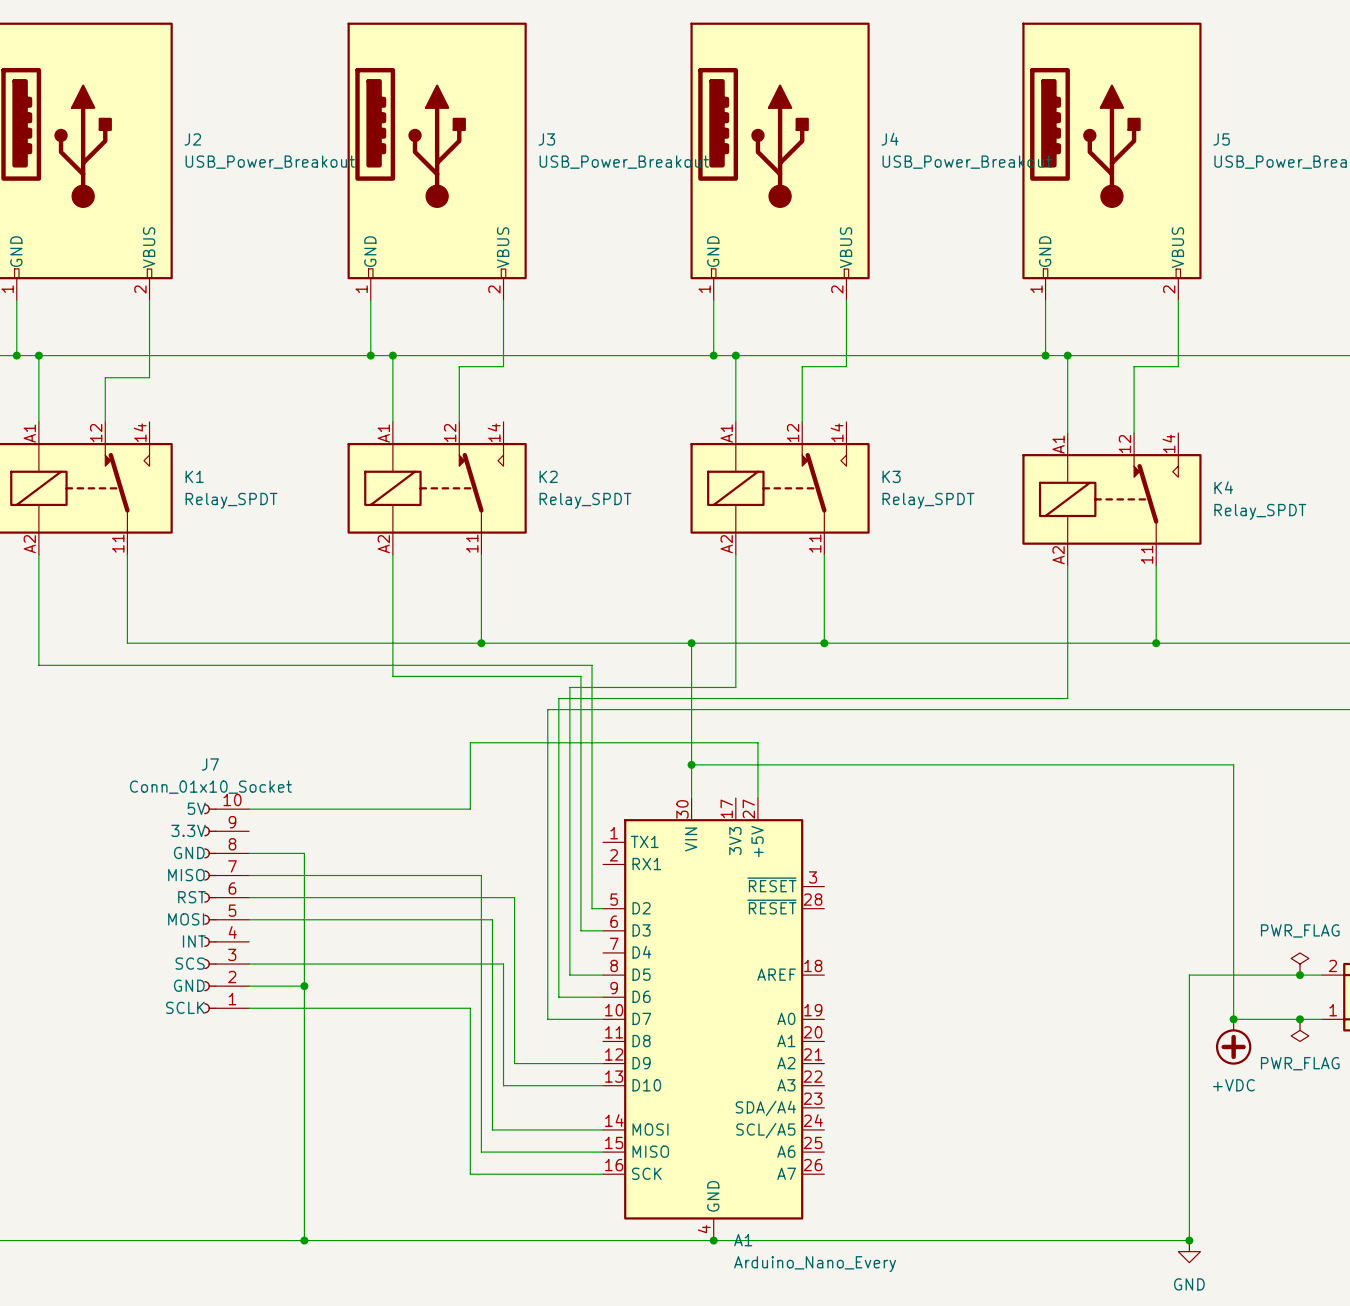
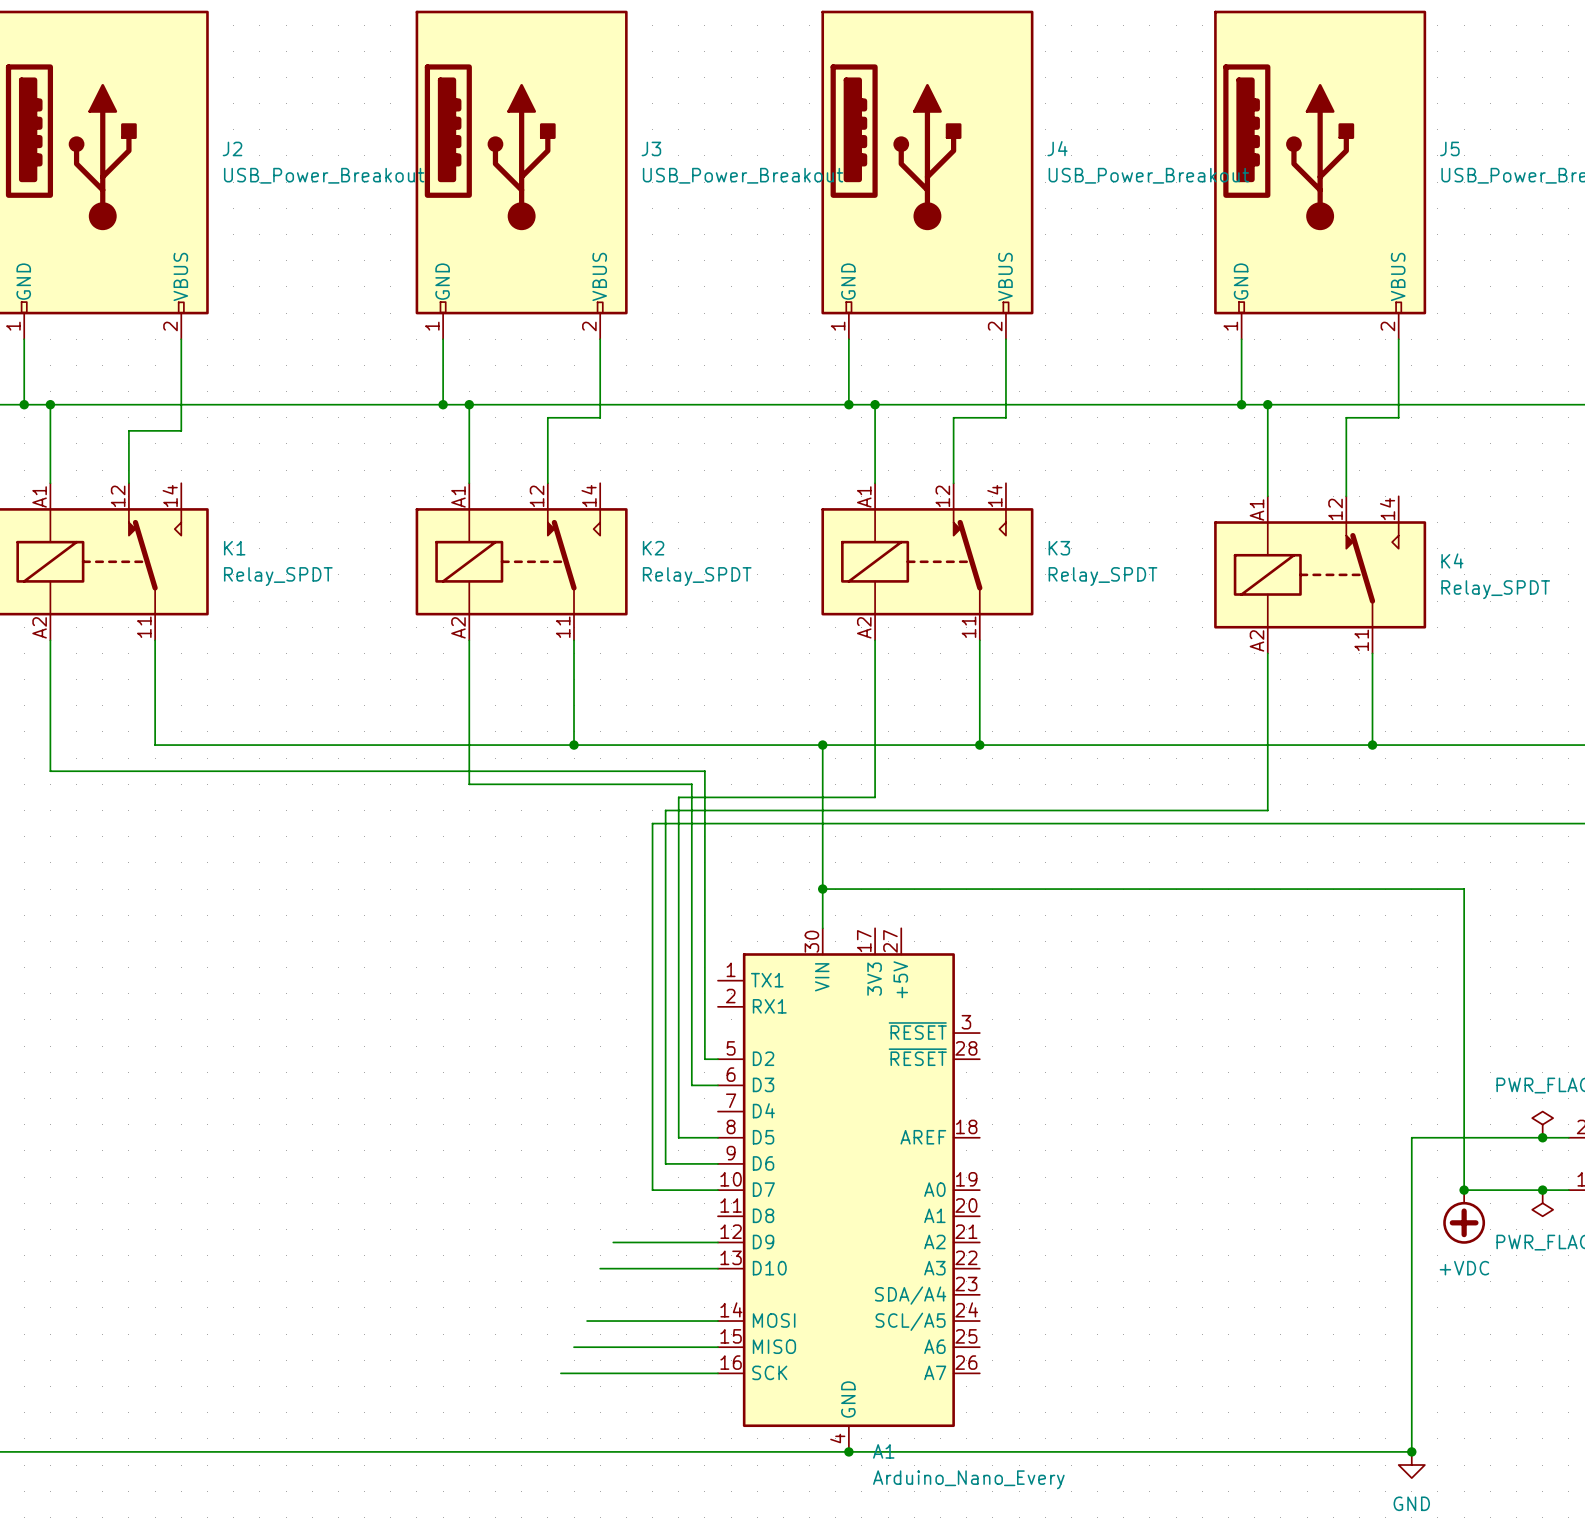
wire: (757, 798) (757, 742) (470, 742) (470, 809) (249, 809) -> none
wire: (249, 853) (304, 853) (304, 1240) -> none
wire: (249, 875) (481, 875) (481, 1152) -> none
wire: (249, 897) (514, 897) (514, 1063) -> none
J7: Conn_01x10_Socket (226, 908) -> none
wire: (249, 919) (492, 919) (492, 1129) -> none
wire: (249, 964) (503, 964) (503, 1085) -> none
wire: (249, 986) (304, 986) -> none
junction: (304, 986) -> none
wire: (249, 1008) (470, 1008) (470, 1174) -> none
junction: (304, 1240) -> none

